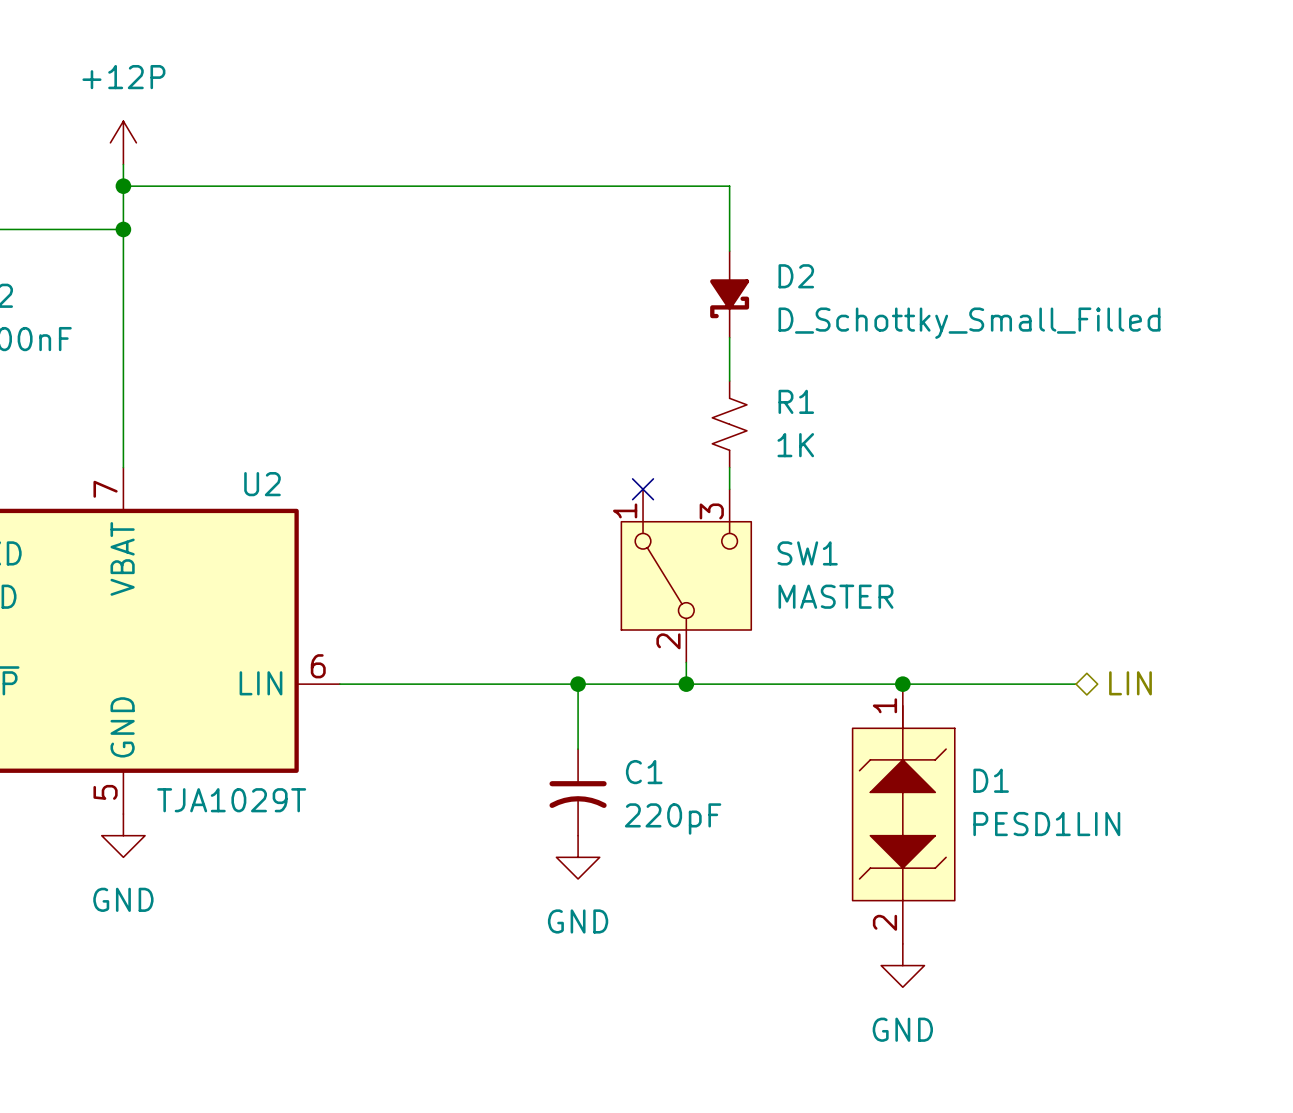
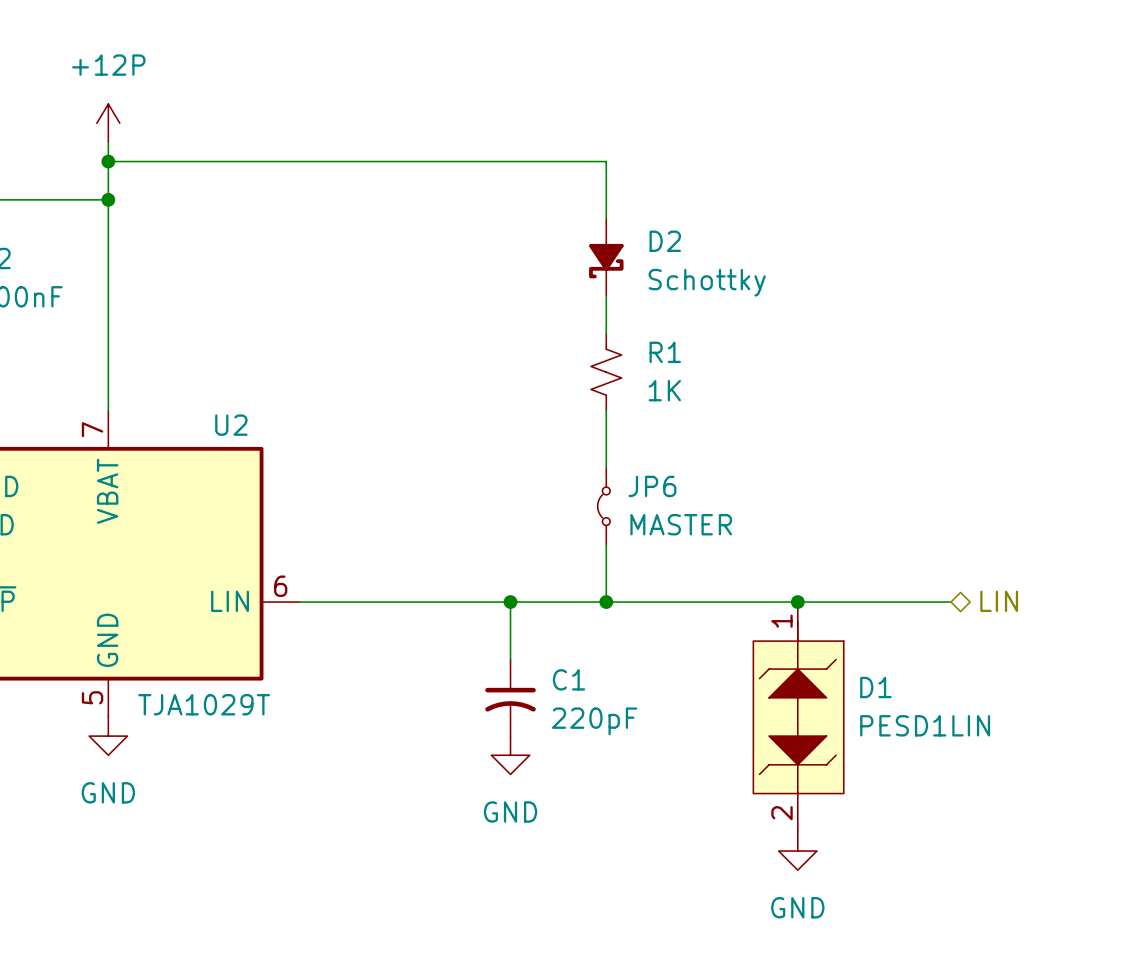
wire: (686, 186) (729, 186) (729, 251) -> (606, 161) (606, 219)
D2 position: (729, 294) -> (606, 257)
D2 value: D_Schottky_Small_Filled (969, 323) -> Schottky (707, 282)
wire: (729, 337) (729, 381) -> (606, 295) (606, 333)
R1 position: (729, 424) -> (606, 372)
wire: none -> (606, 410) (606, 467)
wire: (729, 467) (729, 489) -> none
no-connect mark: (643, 489) -> none
JP6: none -> MASTER (603, 506)
SW1: MASTER (686, 575) -> none

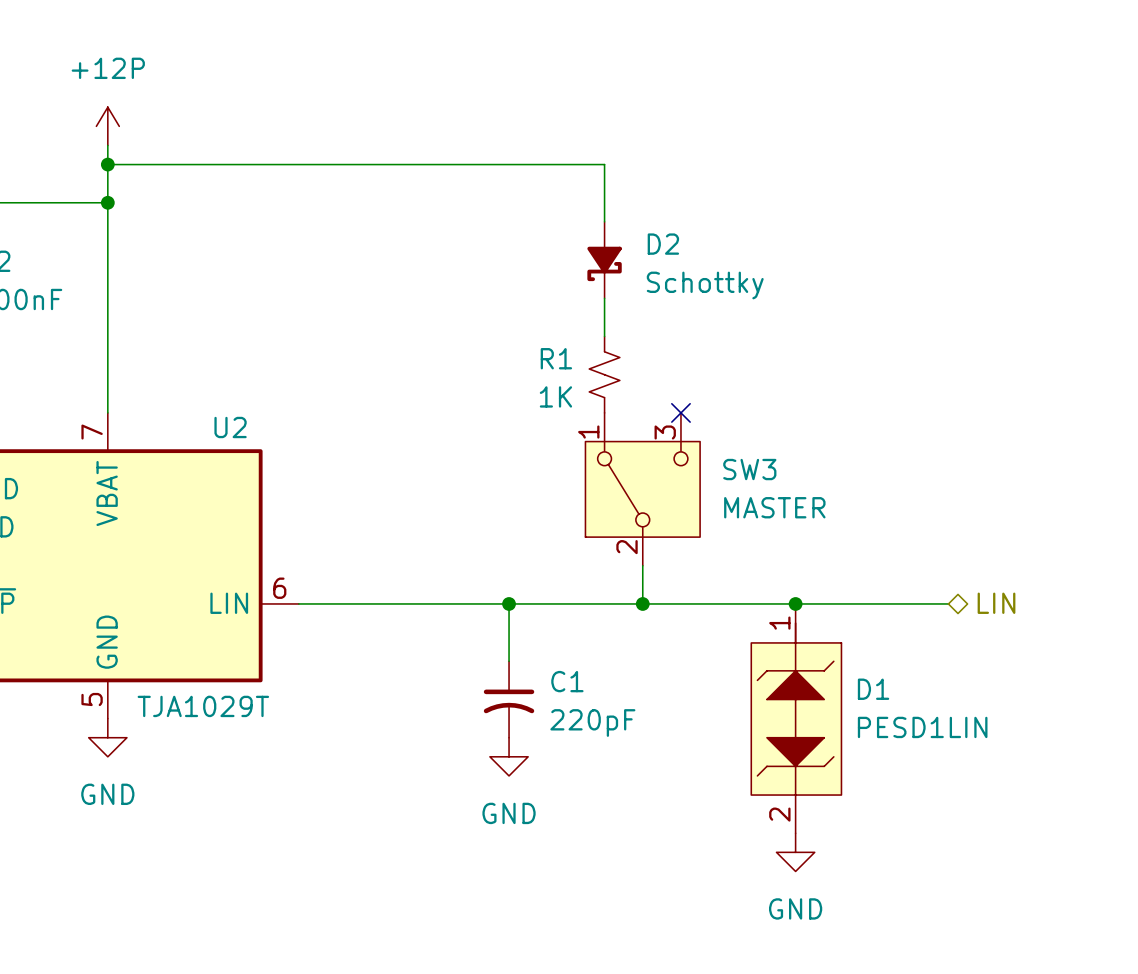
R1 name position: R1 (665, 352) -> R1 (556, 358)
R1 value position: 1K (664, 390) -> 1K (555, 396)
no-connect mark: none -> (680, 412)
SW3: none -> MASTER (642, 489)
JP6: MASTER (603, 506) -> none
wire: (606, 544) (606, 602) -> none
wire: none -> (642, 565) (642, 603)
junction position: (606, 602) -> (642, 603)

